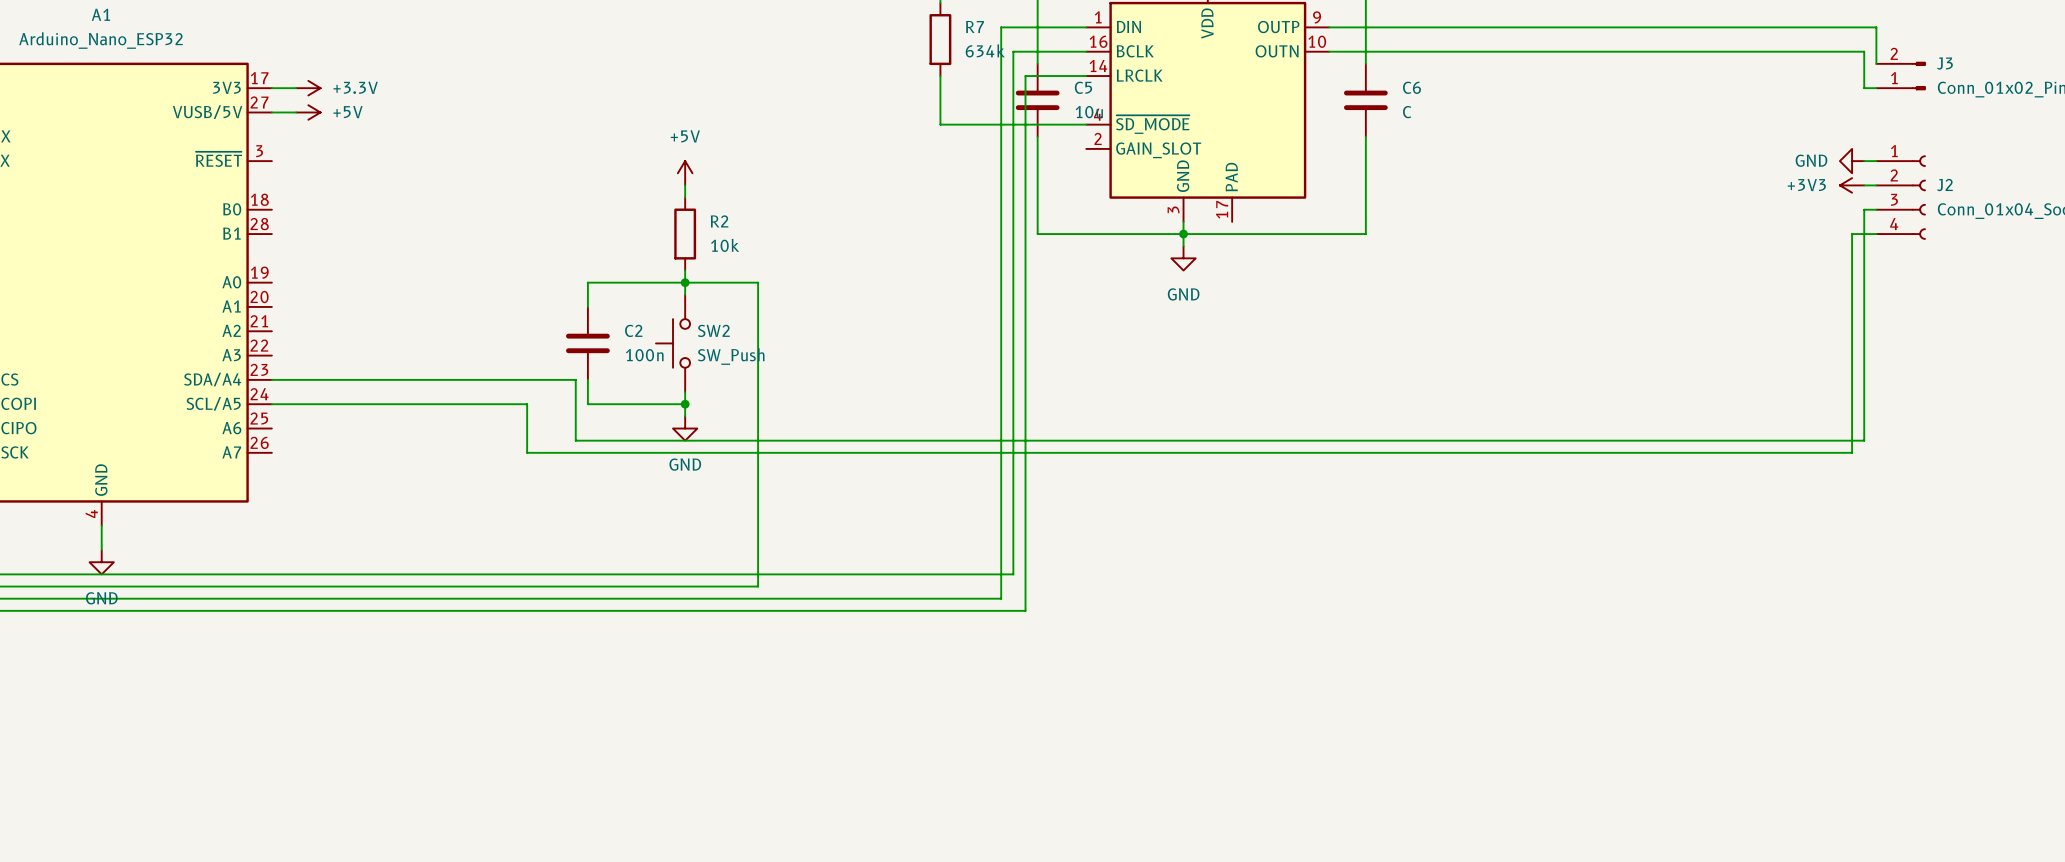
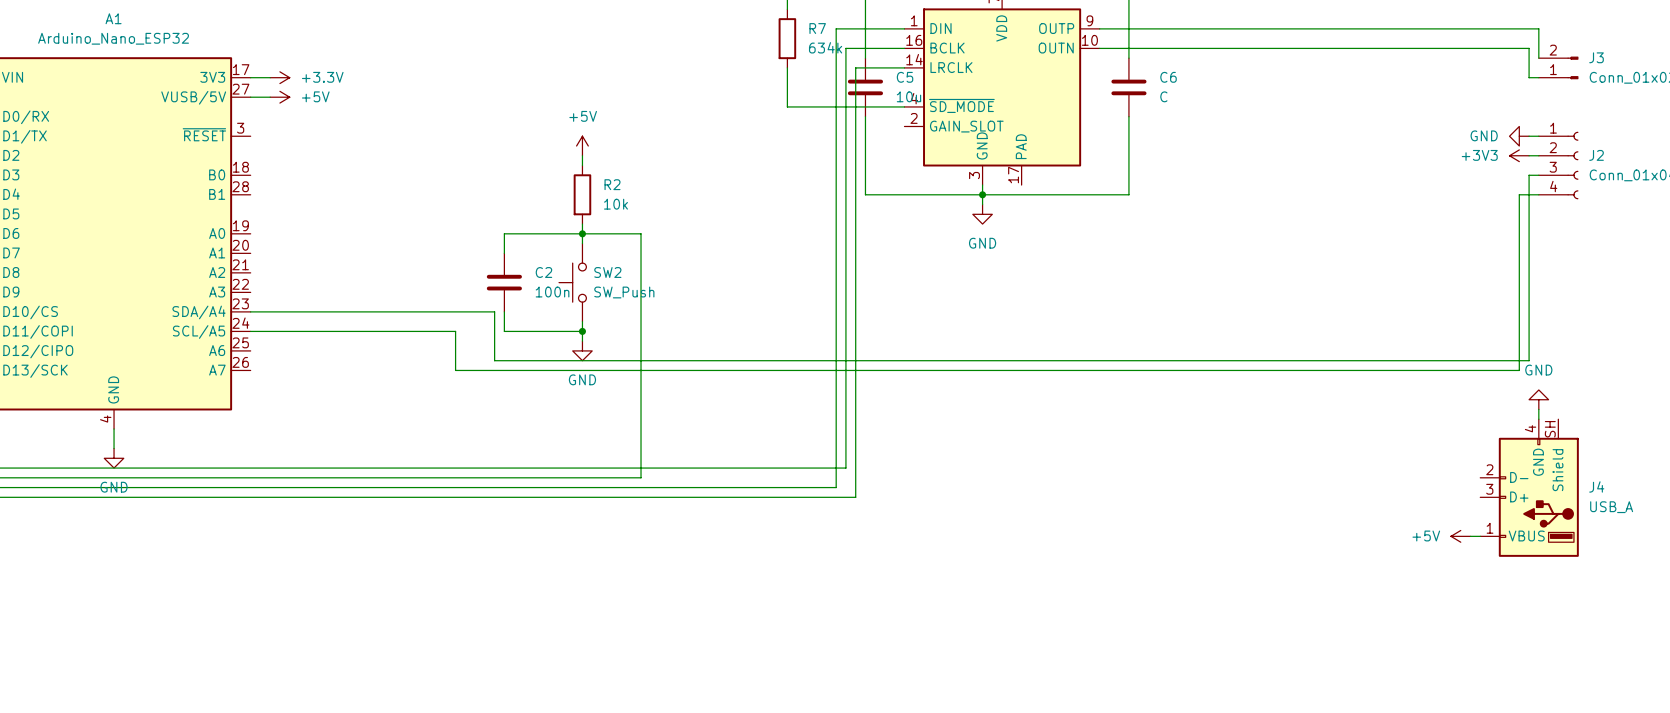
power symbol: none -> GND (1538, 399)
wire: none -> (1538, 409) (1538, 419)
J4: none -> USB_A (1529, 488)
power symbol: none -> +5V (1460, 536)
wire: none -> (1470, 536) (1480, 536)

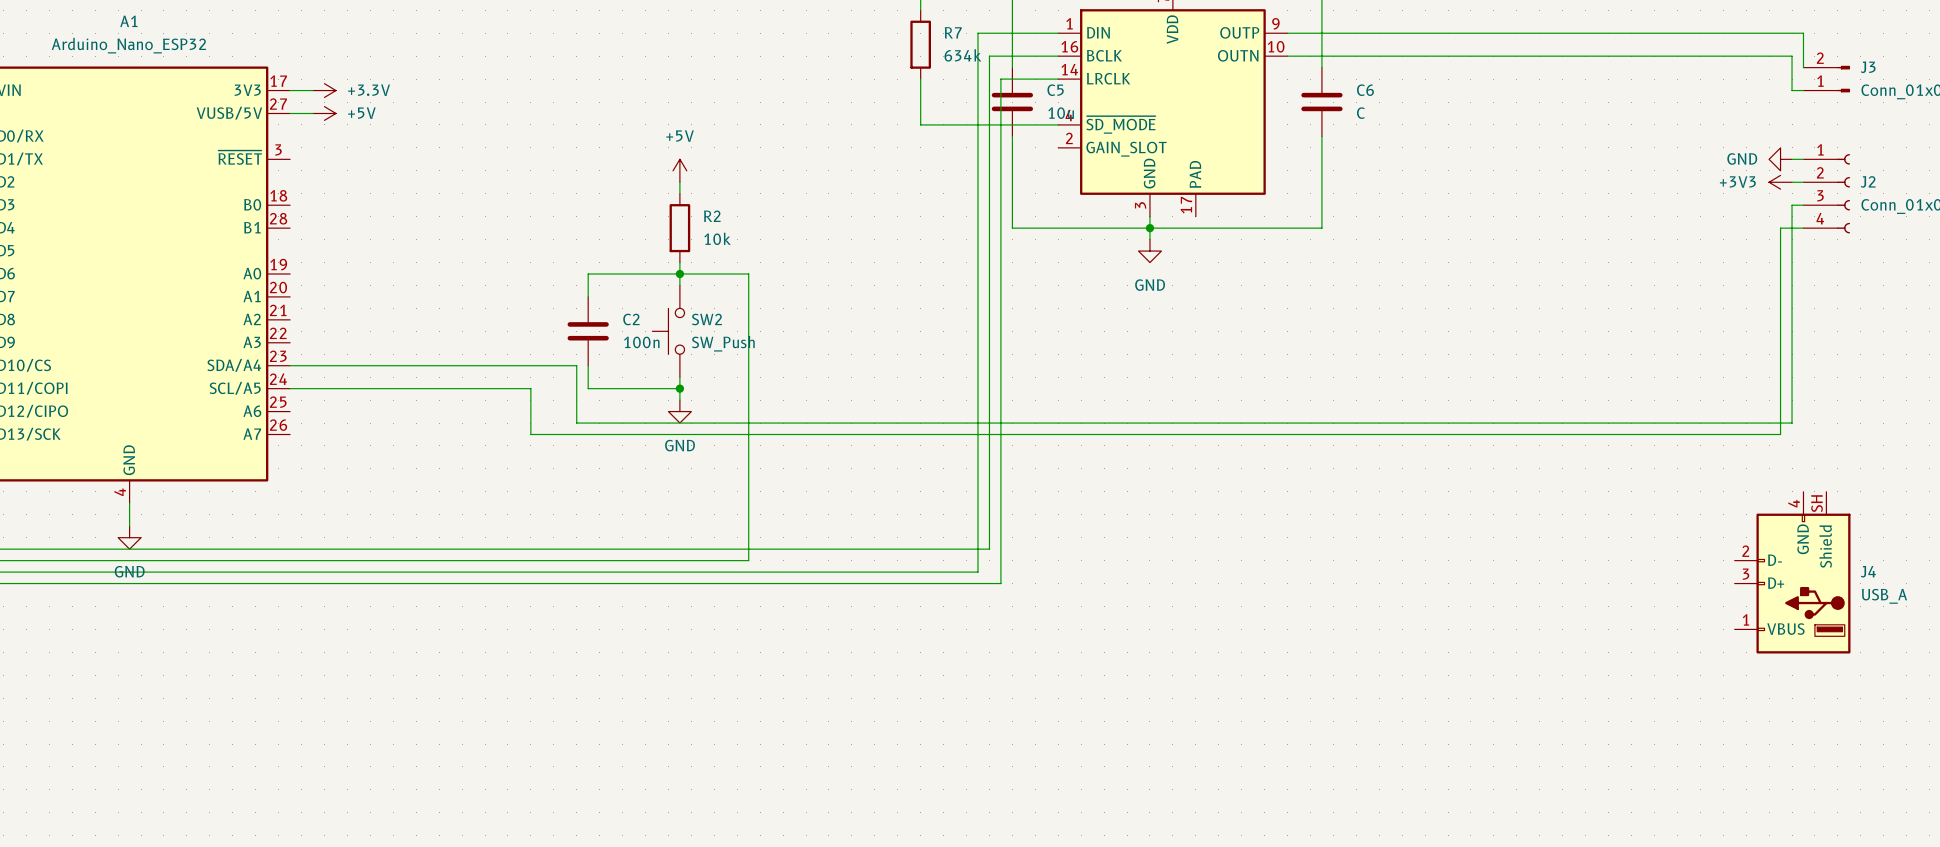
power symbol: GND (1538, 399) -> none
wire: (1538, 409) (1538, 419) -> none
power symbol: +5V (1460, 536) -> none
wire: (1470, 536) (1480, 536) -> none

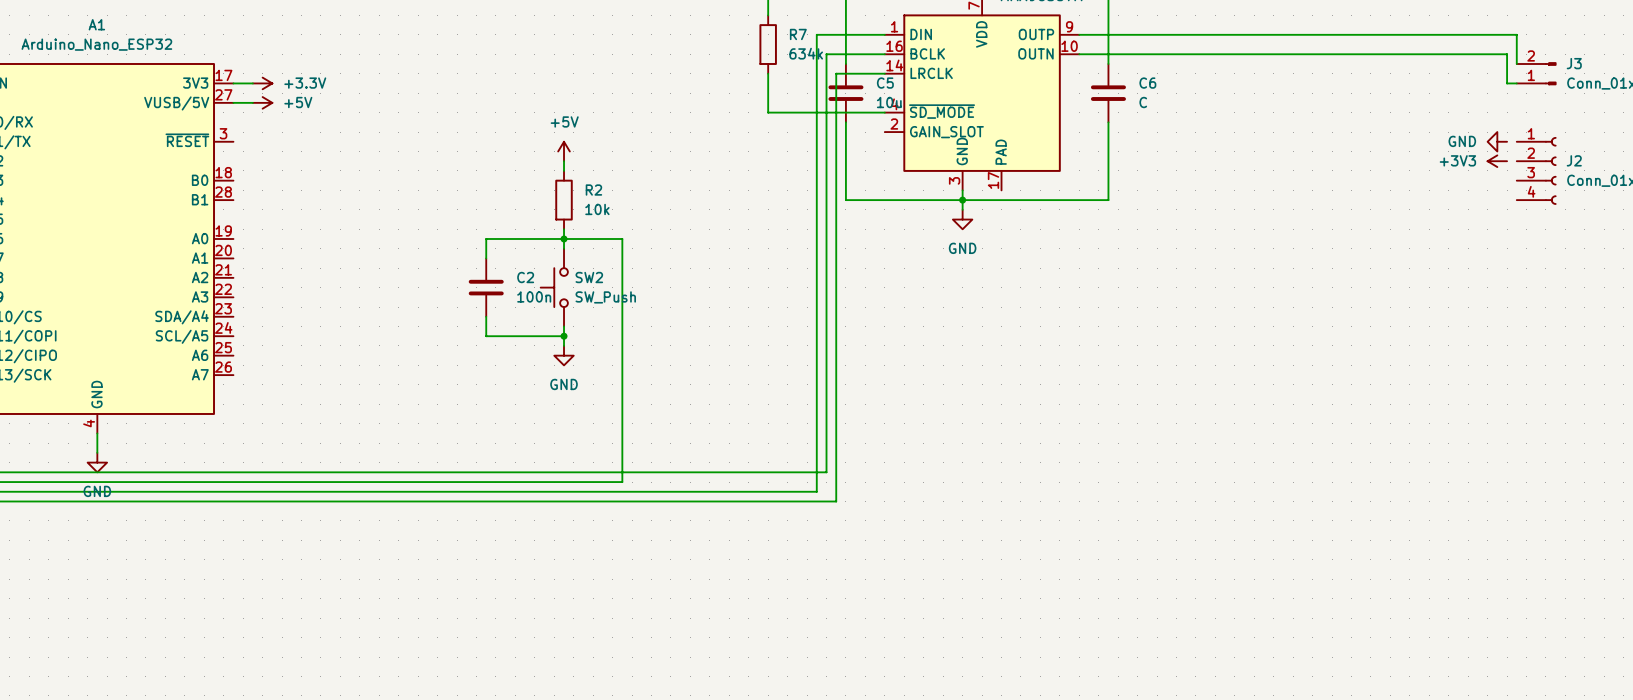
wire: (1792, 159) (1803, 159) -> none
wire: (1792, 182) (1803, 182) -> none
wire: (1803, 205) (1792, 205) (1792, 423) (576, 423) (576, 365) (290, 365) -> none
wire: (1803, 228) (1780, 228) (1780, 434) (530, 434) (530, 388) (290, 388) -> none
J4: USB_A (1792, 572) -> none

